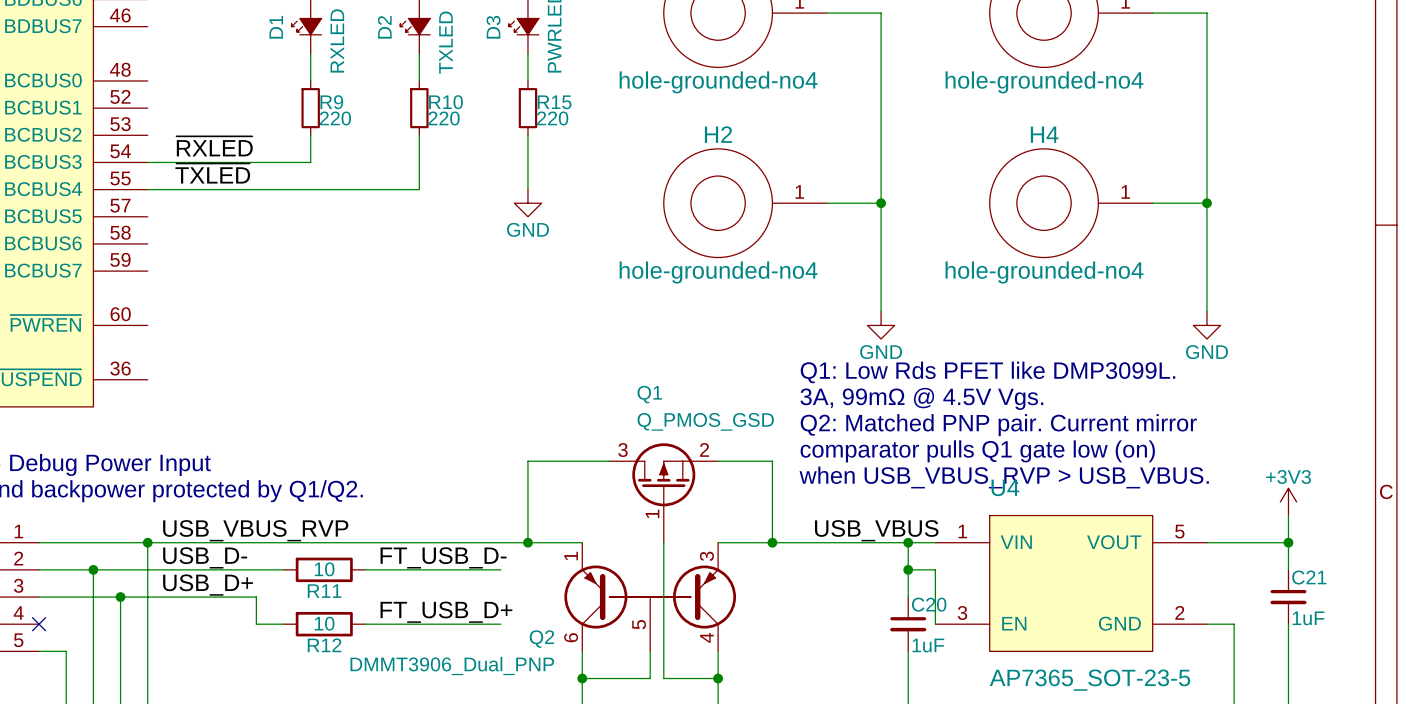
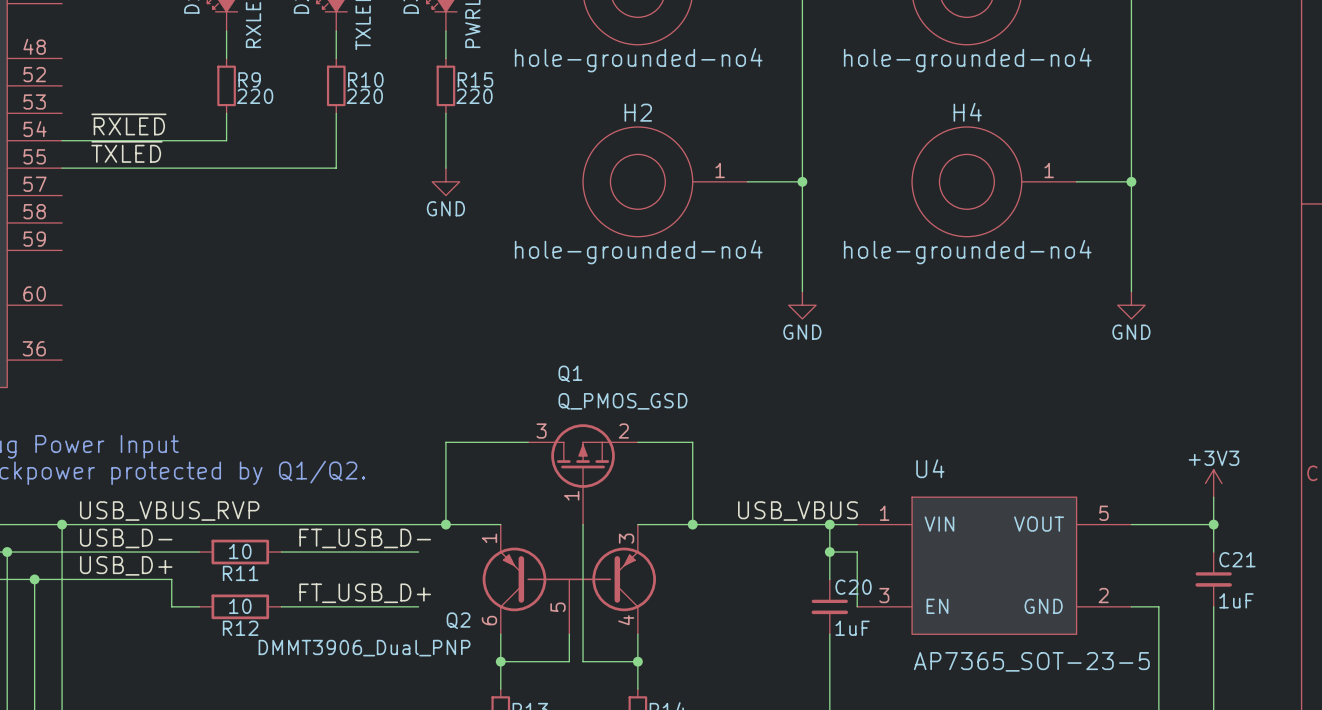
text: Q1: Low Rds PFET like DMP3099L. (987, 372) -> none
text: 3A, 99mΩ @ 4.5V Vgs. (921, 398) -> none
text: Q2: Matched PNP pair. Current mirror (998, 425) -> none
text: comparator pulls Q1 gate low (on) (977, 451) -> none
text: when USB_VBUS_RVP > USB_VBUS. (1004, 477) -> none

